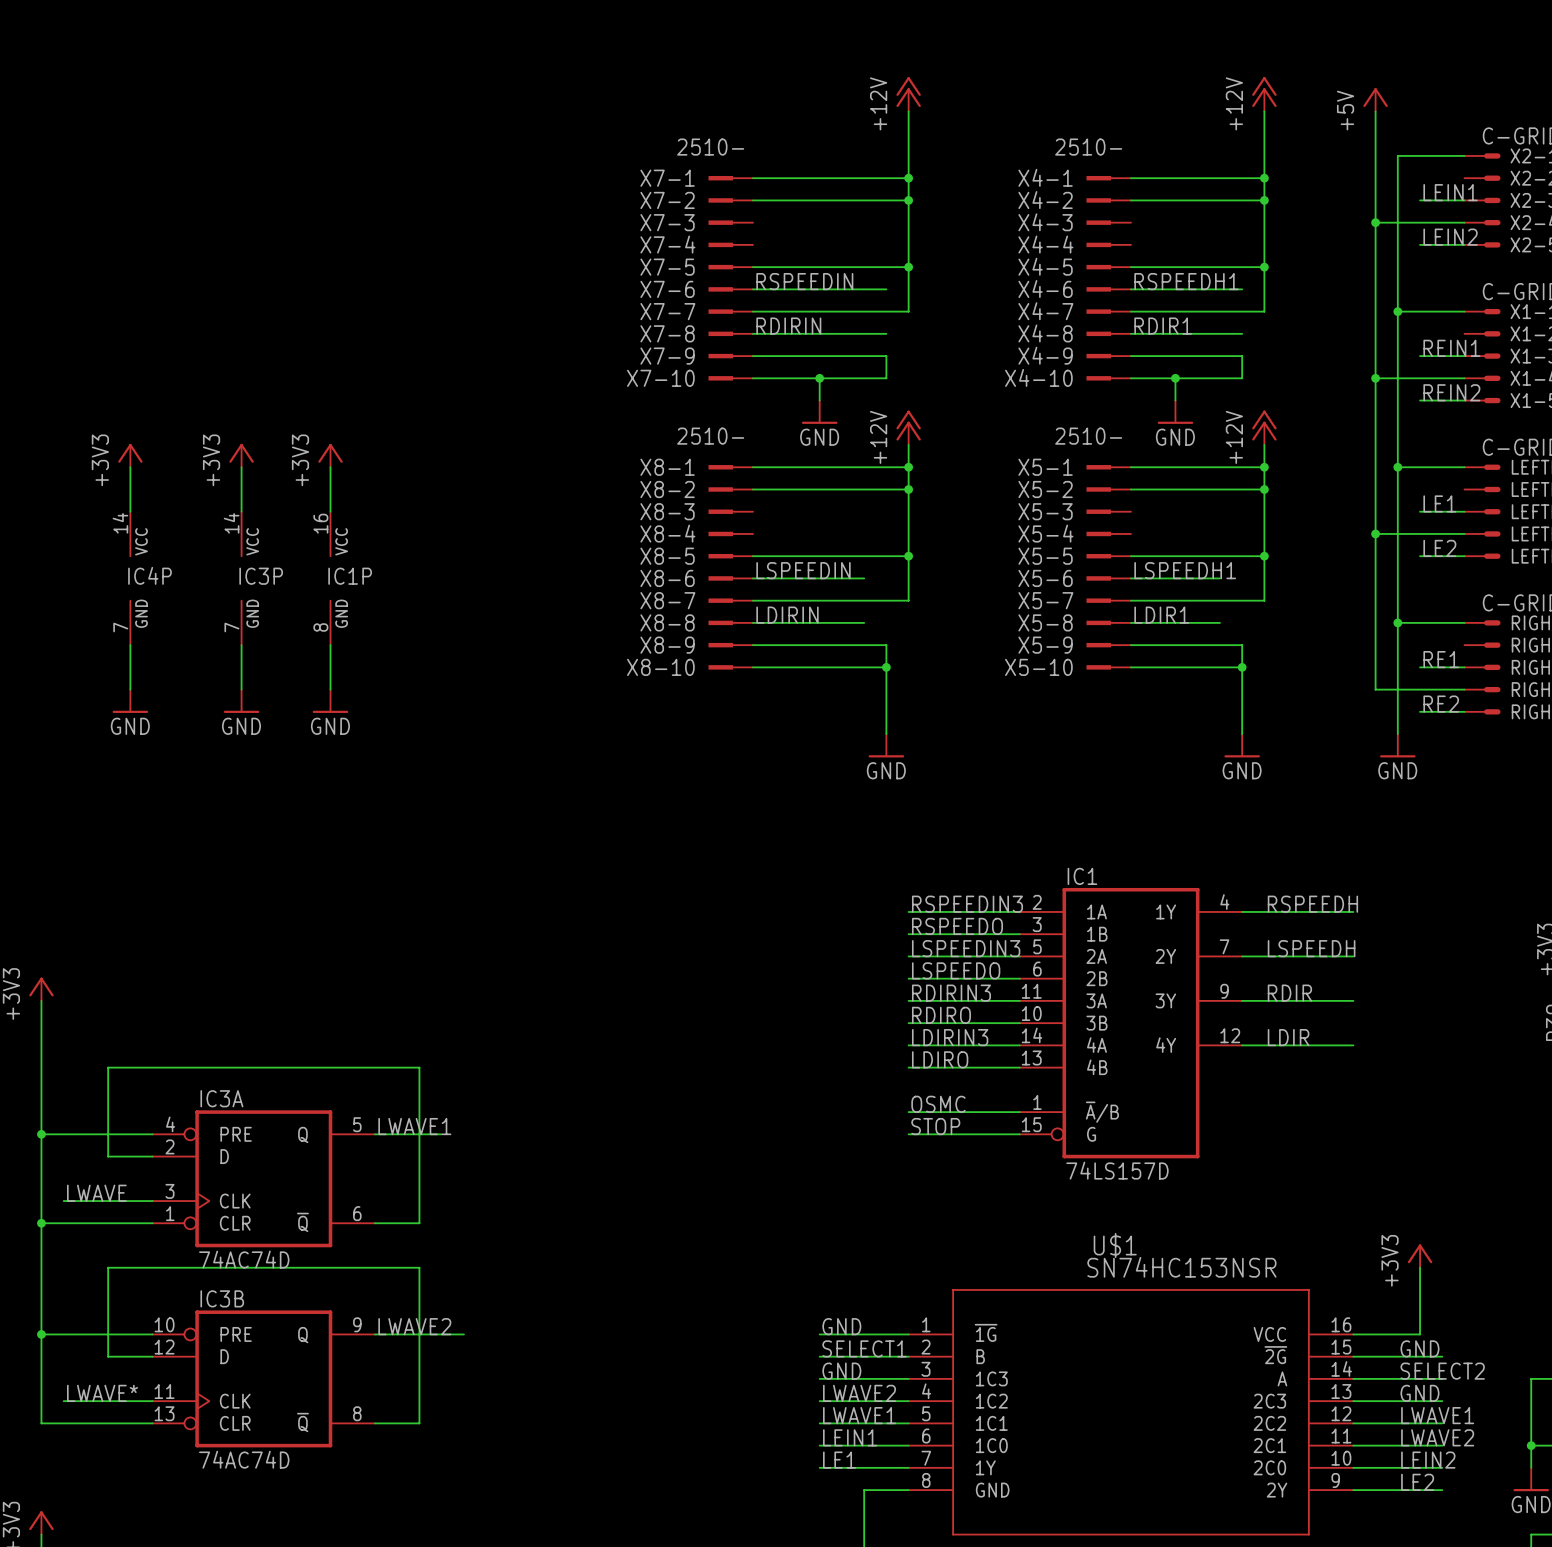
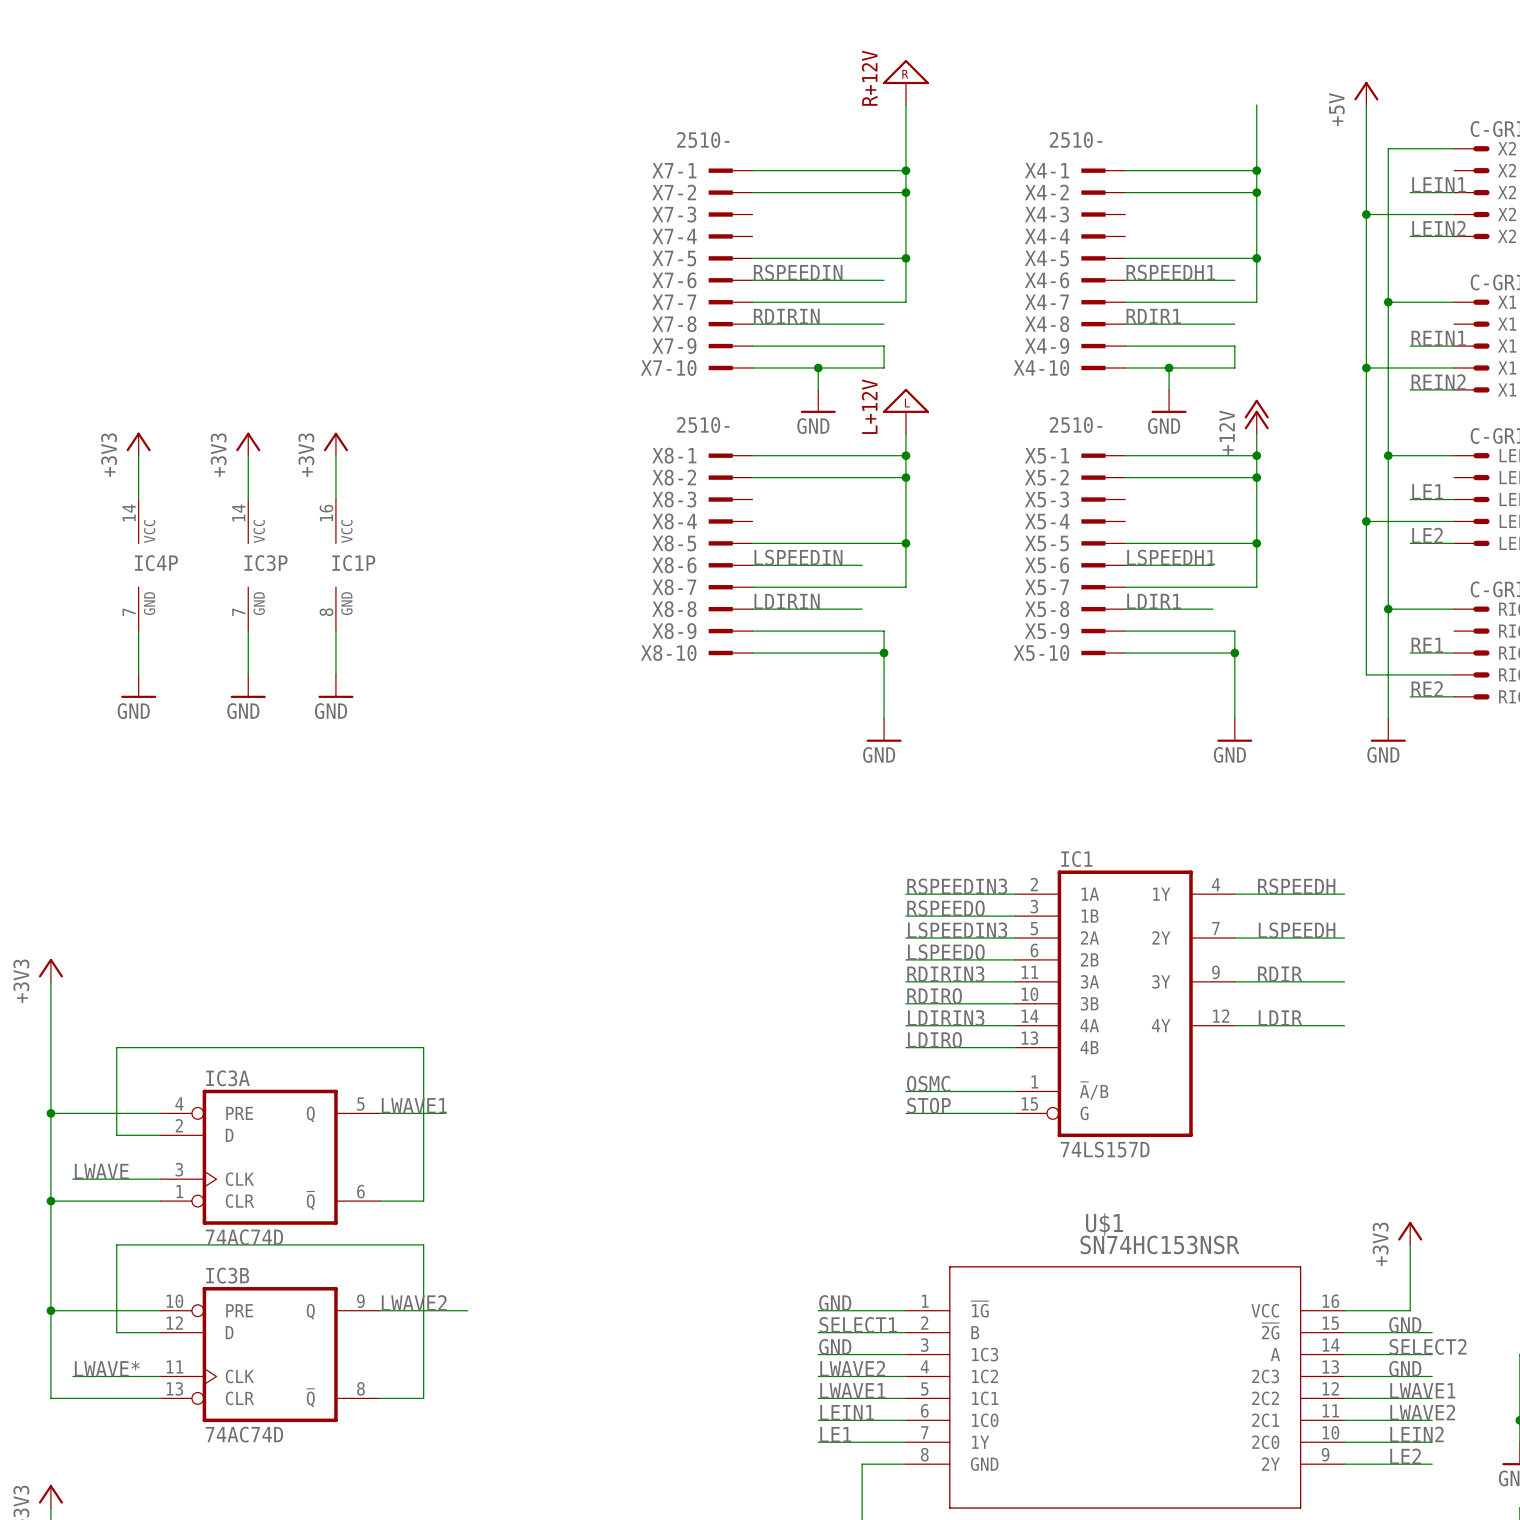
power symbol: +12V (908, 94) -> R+12V (905, 82)
power symbol: +12V (1264, 94) -> none
power symbol: +12V (908, 427) -> L+12V (905, 411)

